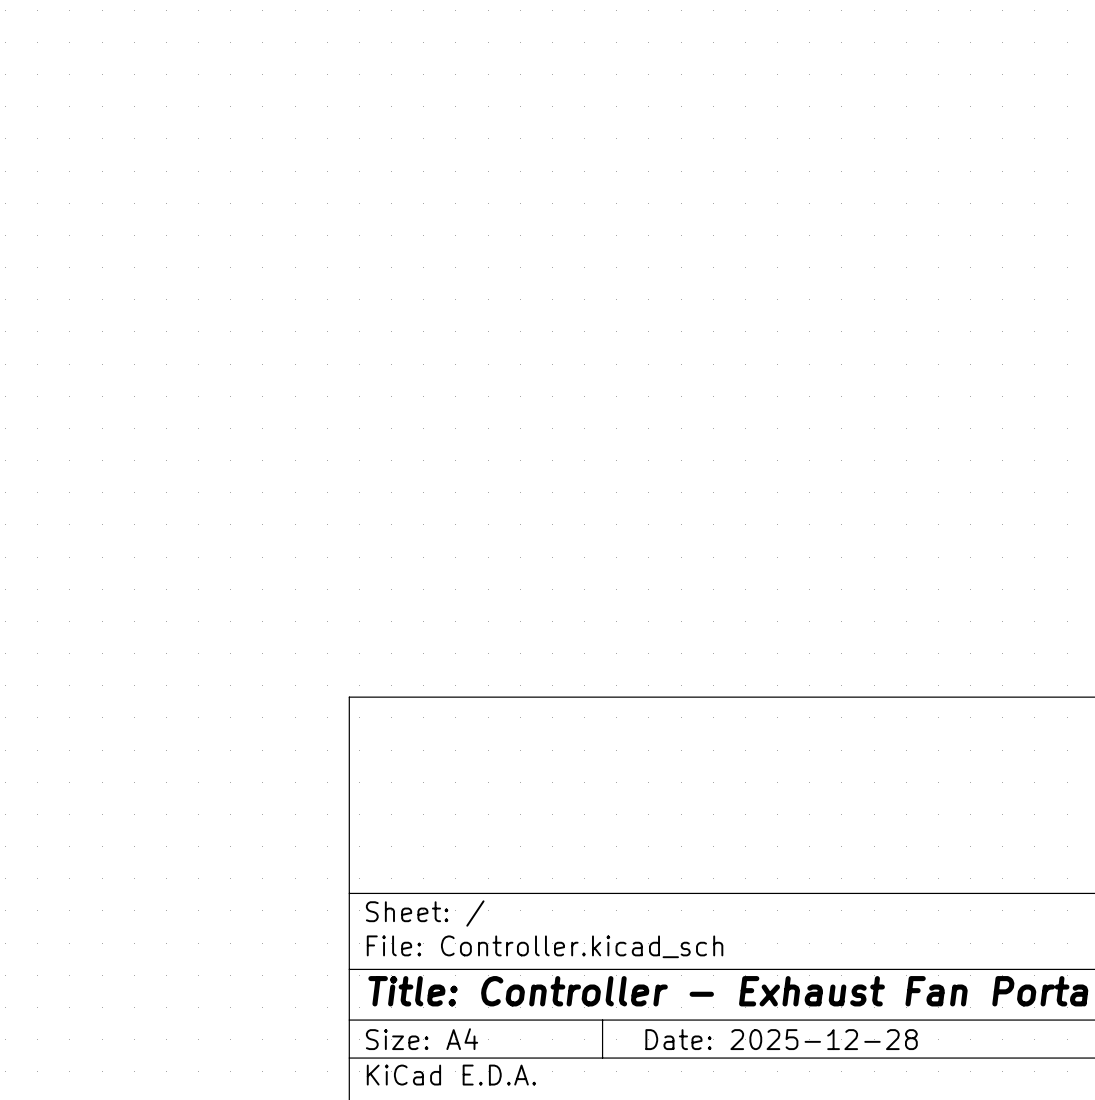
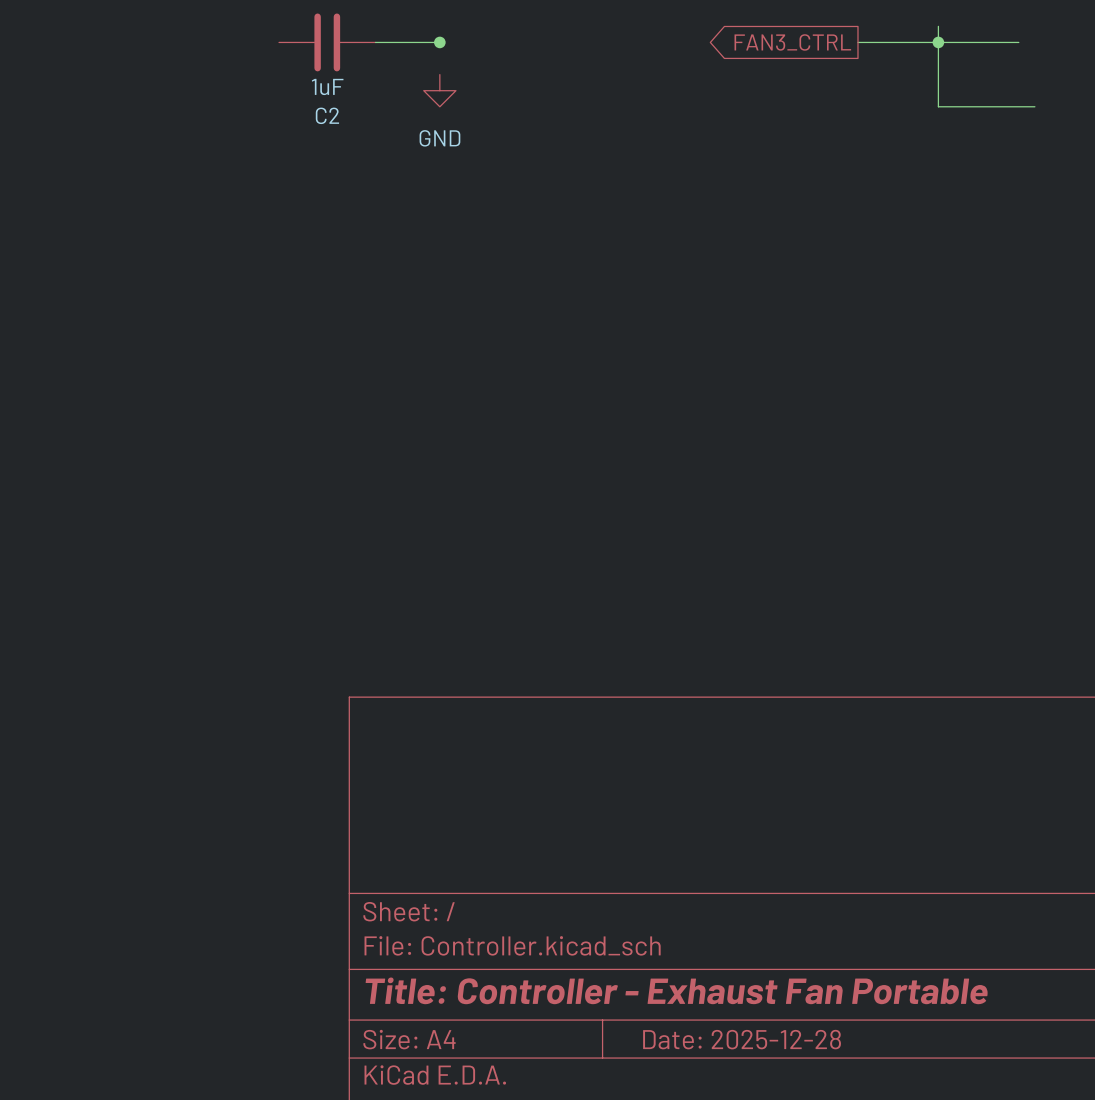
wire: none -> (938, 26) (938, 106) (1034, 106)
C2: none -> 1uF (327, 42)
wire: none -> (375, 42) (439, 42)
junction: none -> (439, 42)
wire: none -> (857, 42) (1018, 42)
junction: none -> (938, 42)
global label: none -> FAN3_CTRL (792, 42)
power symbol: none -> GND (439, 90)

